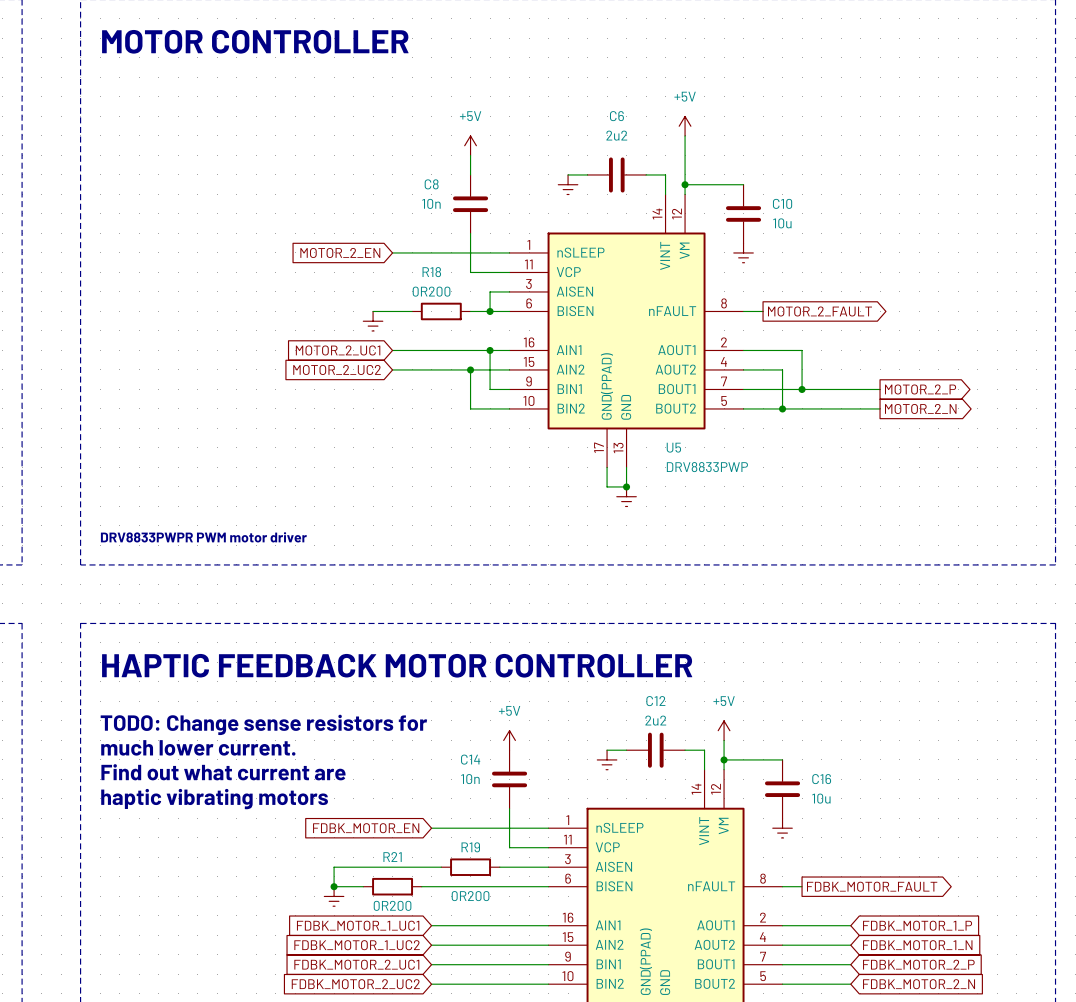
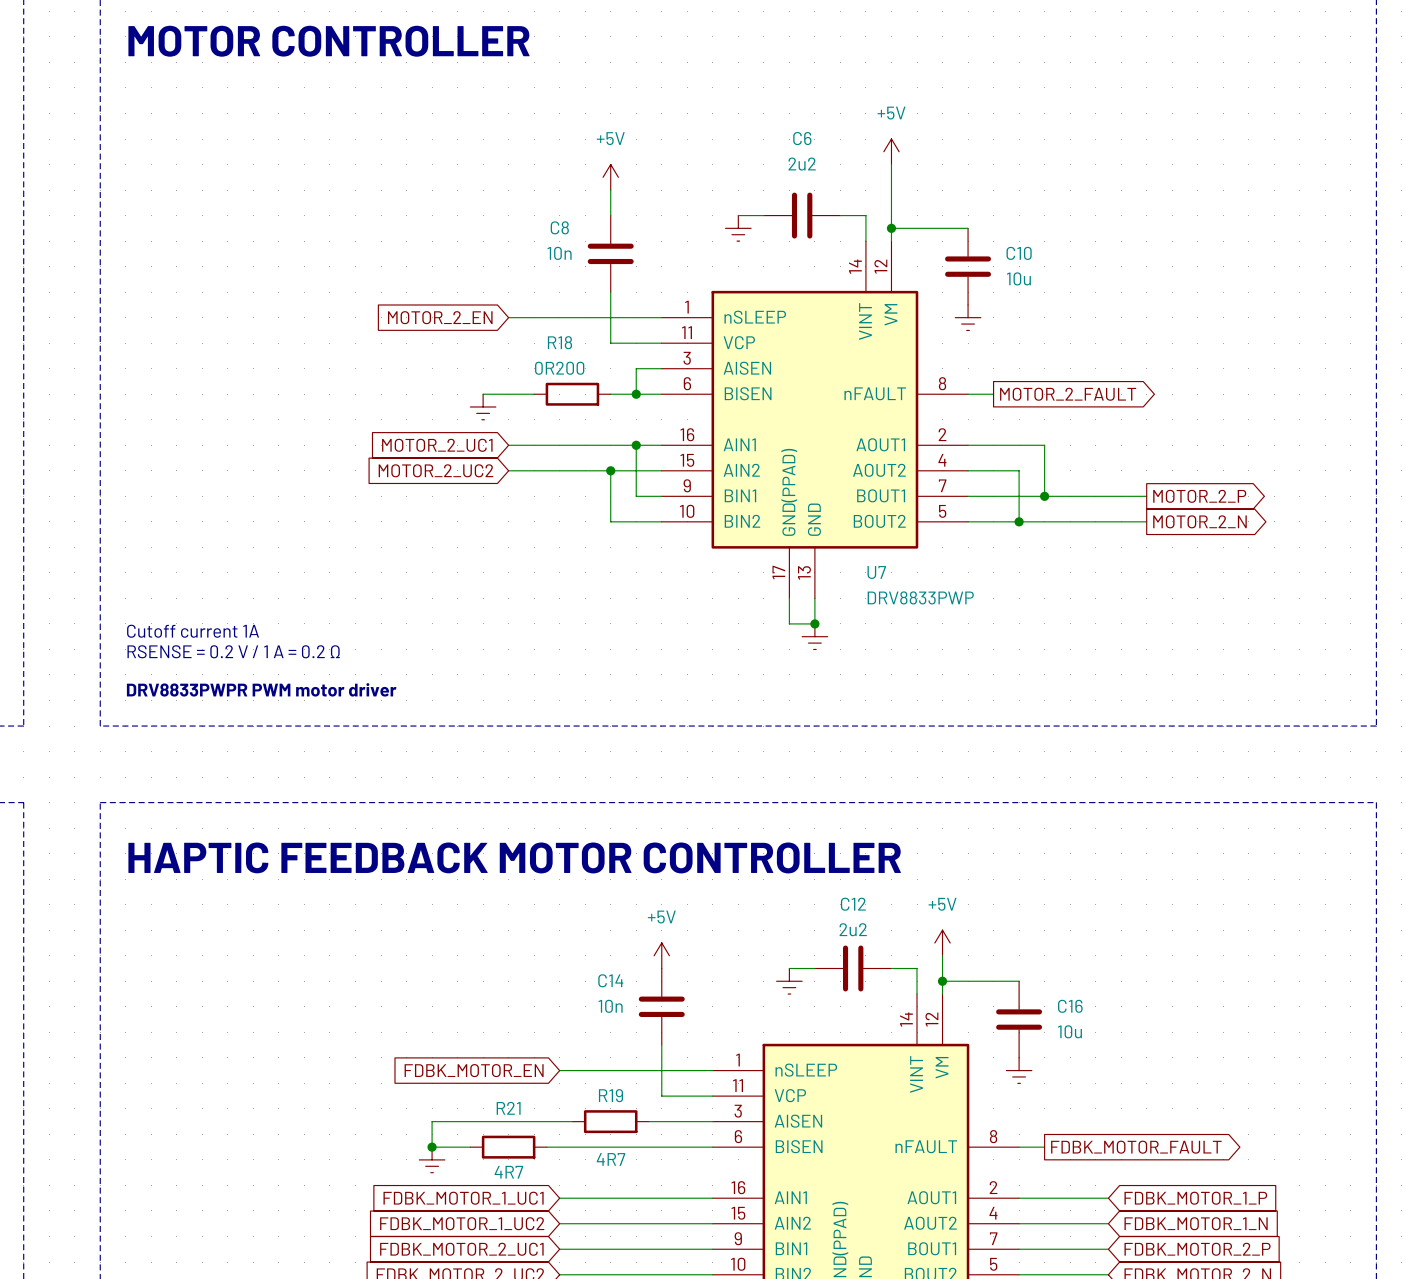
U5 name: U5 (673, 447) -> U7 (876, 572)
text: none -> Cutoff current 1A (193, 631)
text: none -> RSENSE = 0.2 V / 1 A = 0.2 Ω (233, 651)
text: TODO: Change sense resistors for (263, 724) -> none
text: much lower current. (198, 747) -> none
text: Find out what current are (223, 772) -> none
text: haptic vibrating motors (214, 799) -> none
R19 value: 0R200 (470, 896) -> 4R7 (610, 1159)
R21 value: 0R200 (392, 905) -> 4R7 (508, 1172)

